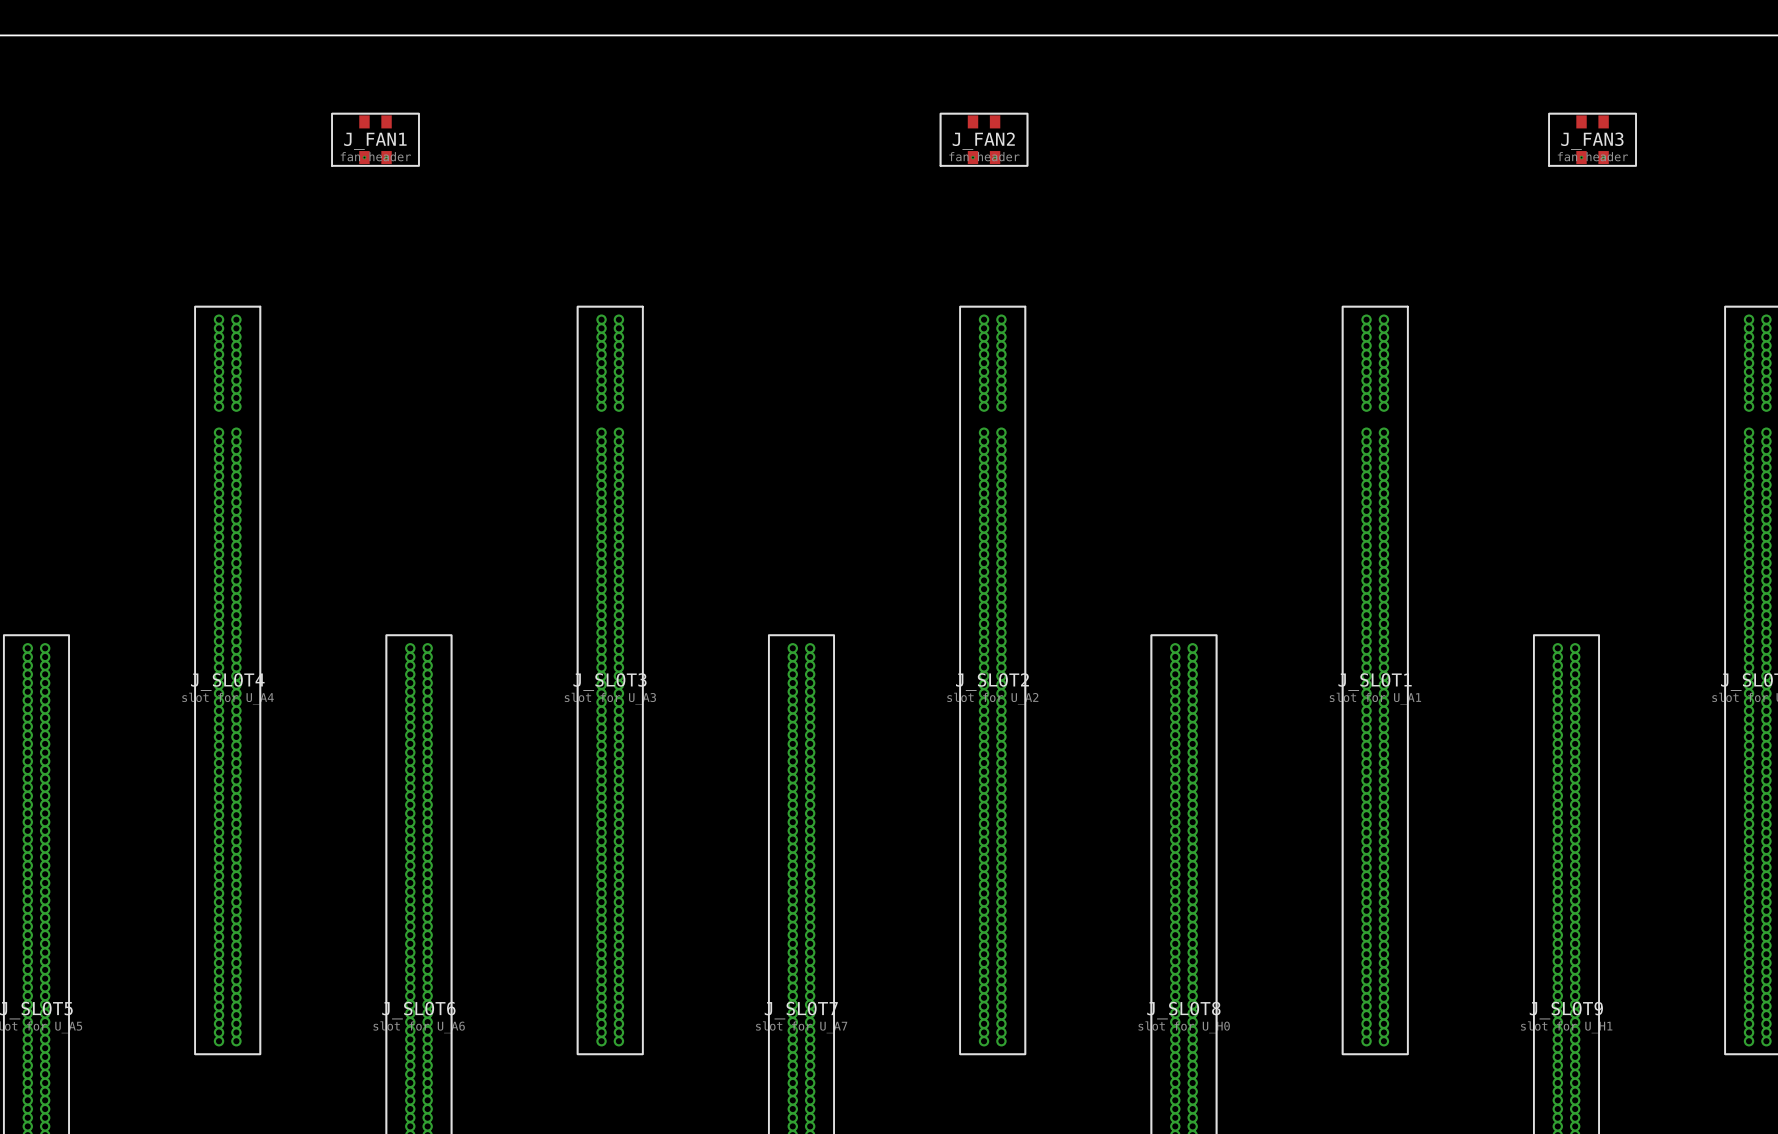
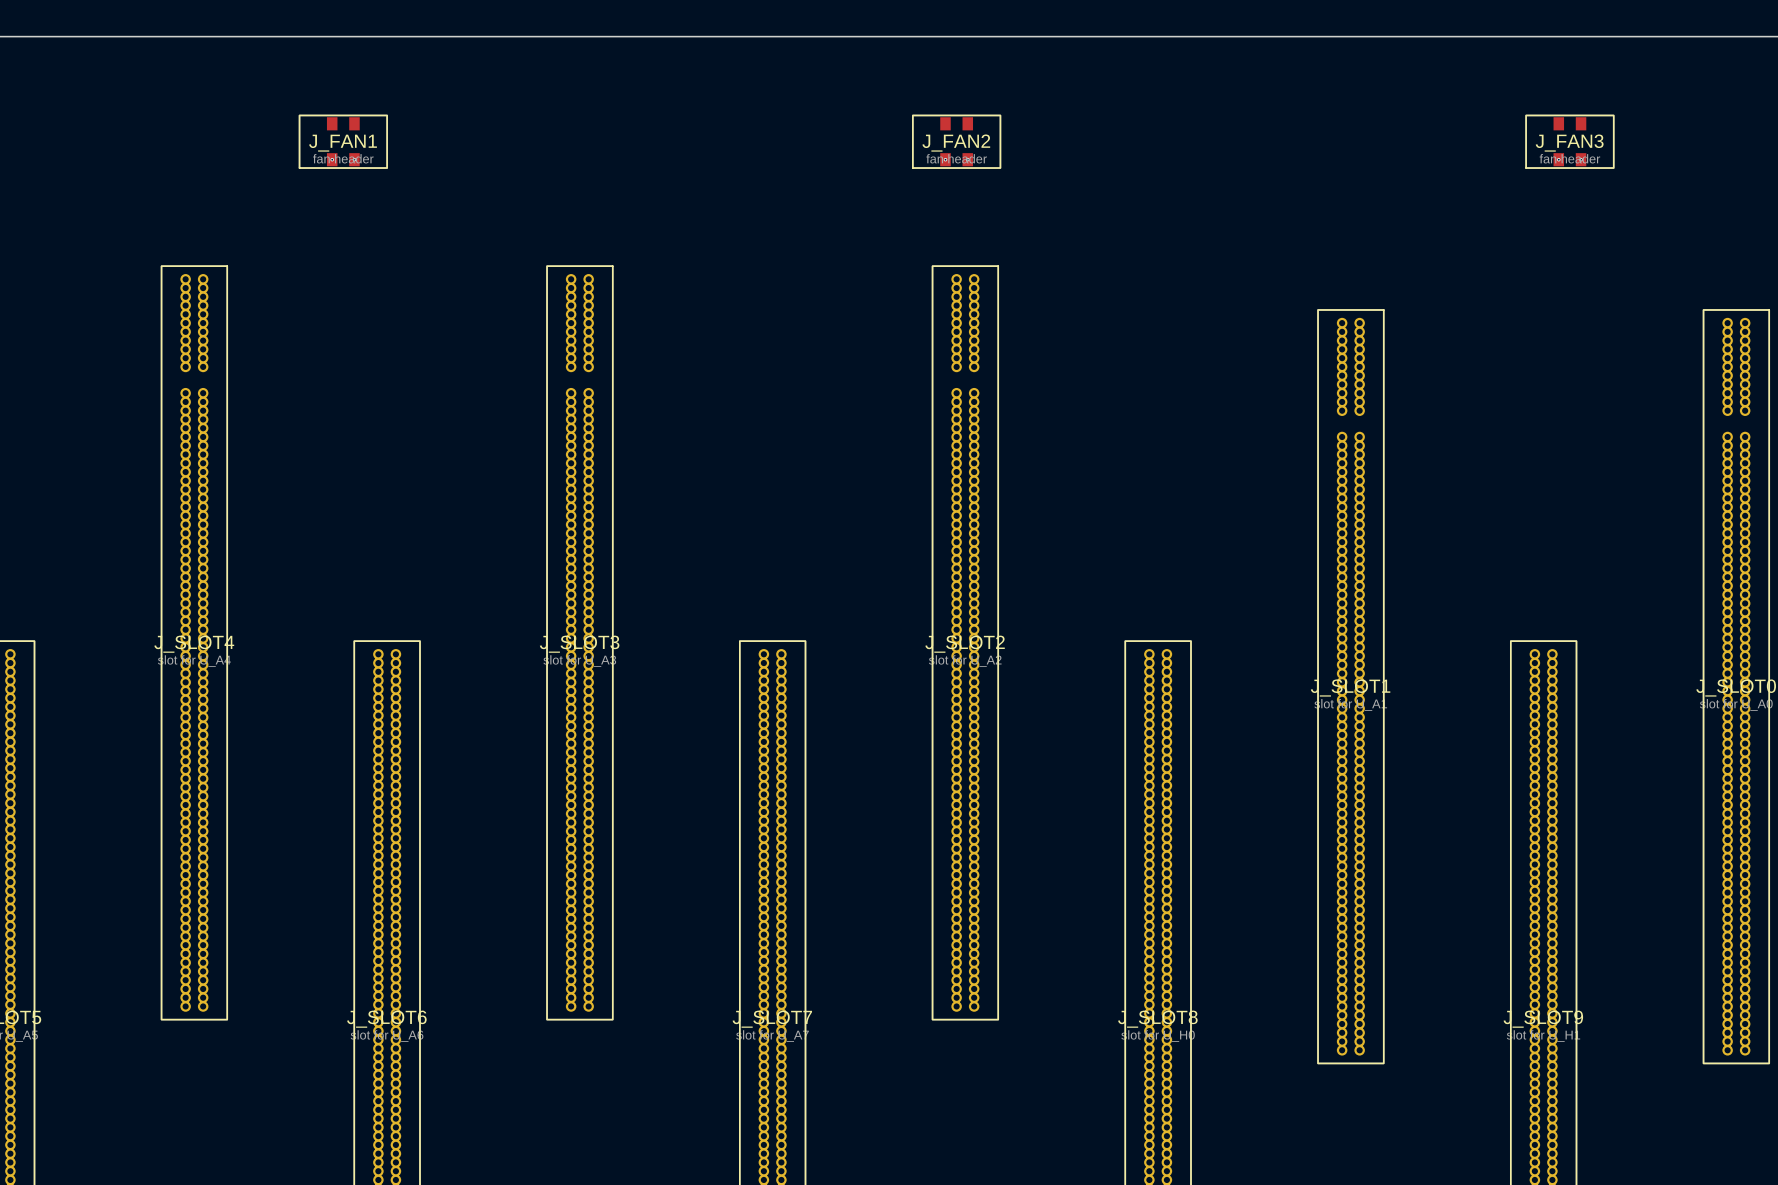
J_SLOT4 position: (227, 680) -> (194, 642)
J_SLOT3 position: (610, 680) -> (579, 642)
J_SLOT2 position: (992, 680) -> (965, 642)

